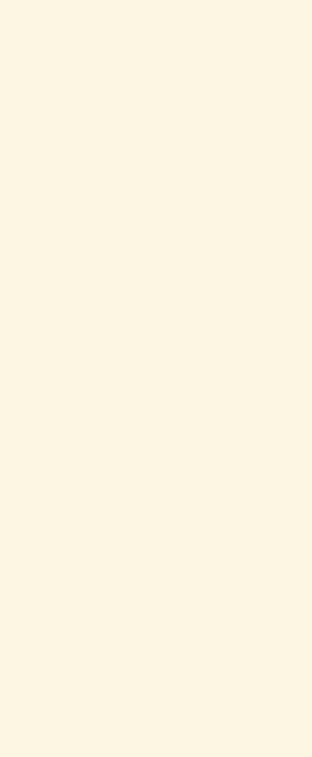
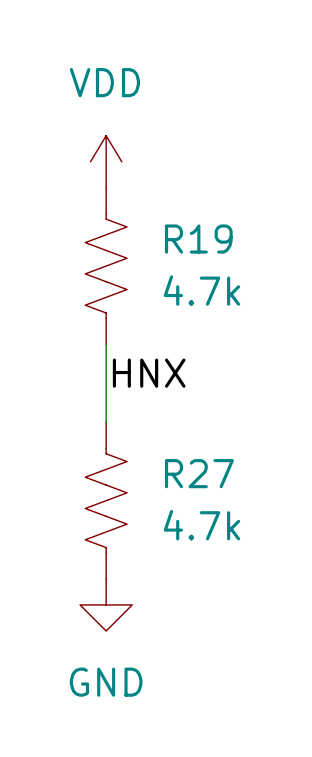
power symbol: none -> VDD (106, 161)
R19: none -> 4.7k (106, 266)
wire: none -> (106, 344) (106, 422)
label: none -> HNX (149, 373)
R27: none -> 4.7k (106, 500)
power symbol: none -> GND (106, 604)

